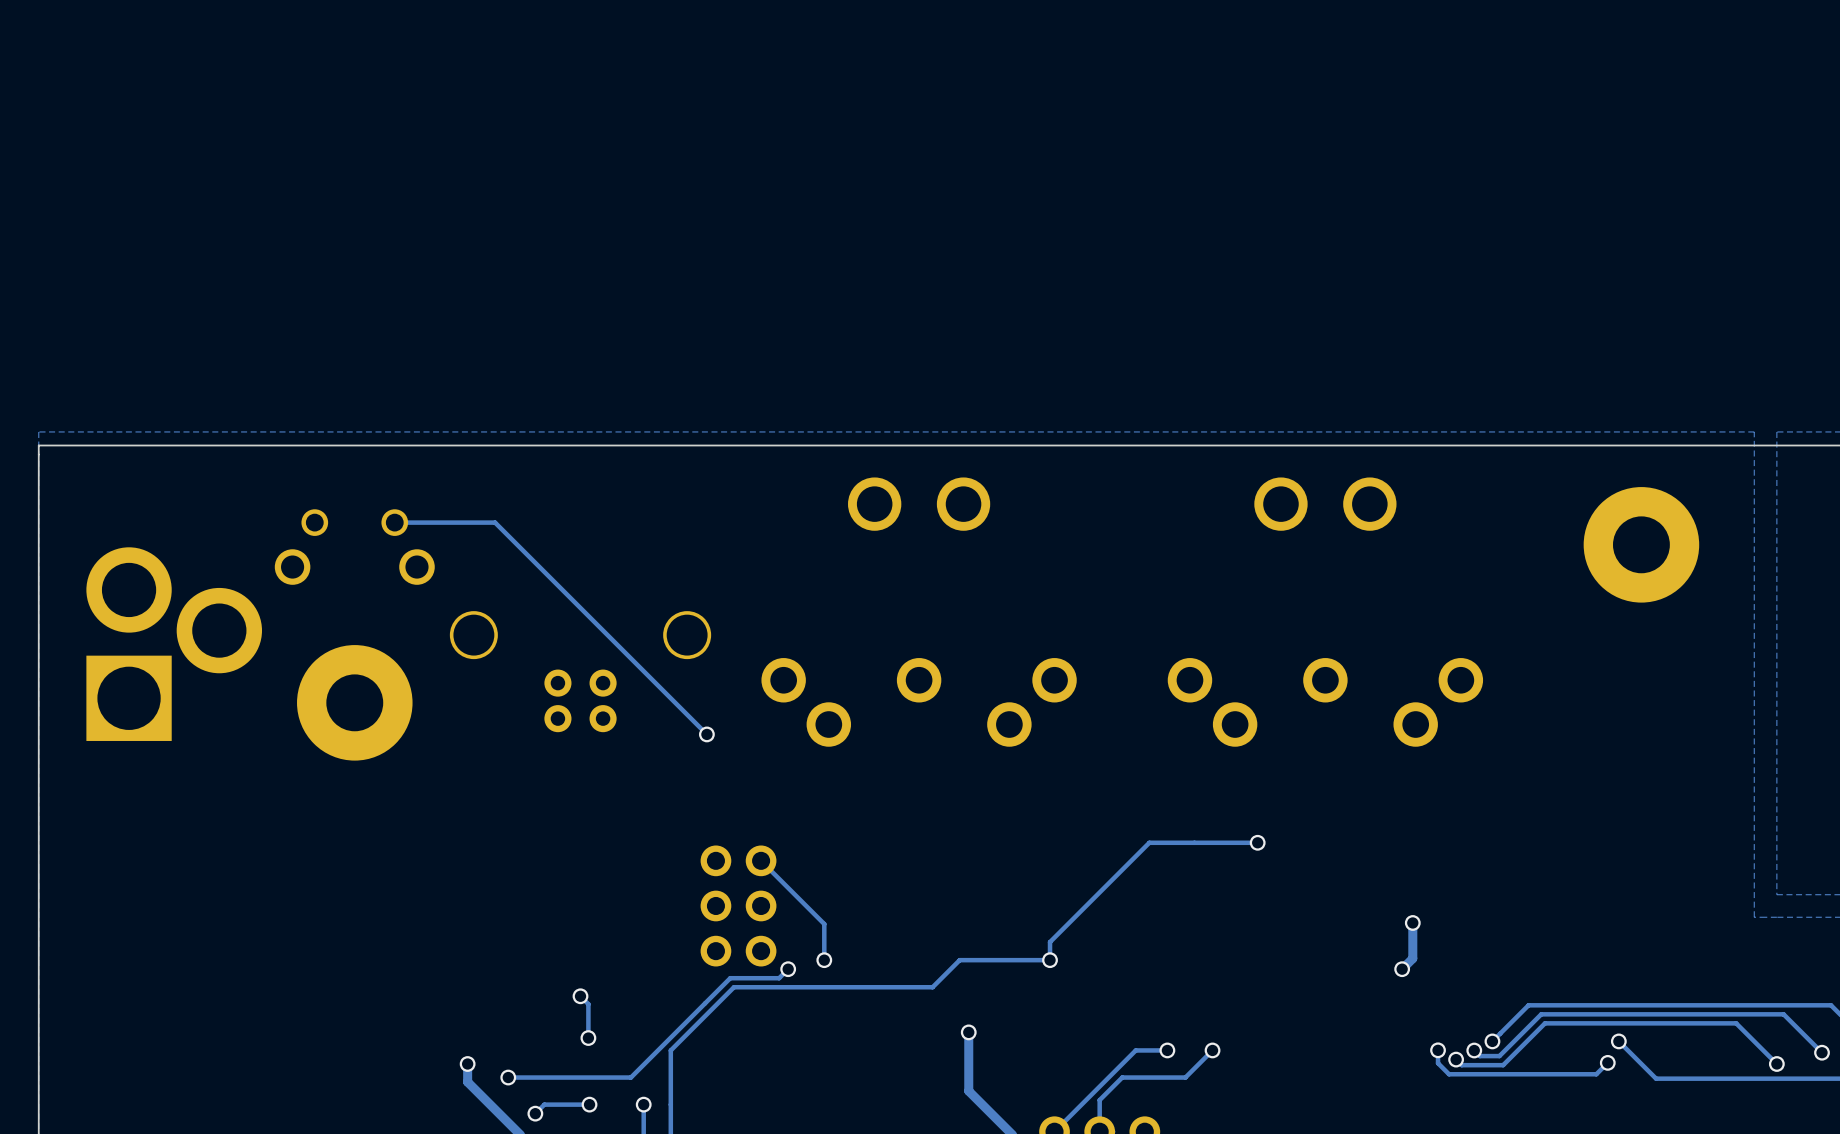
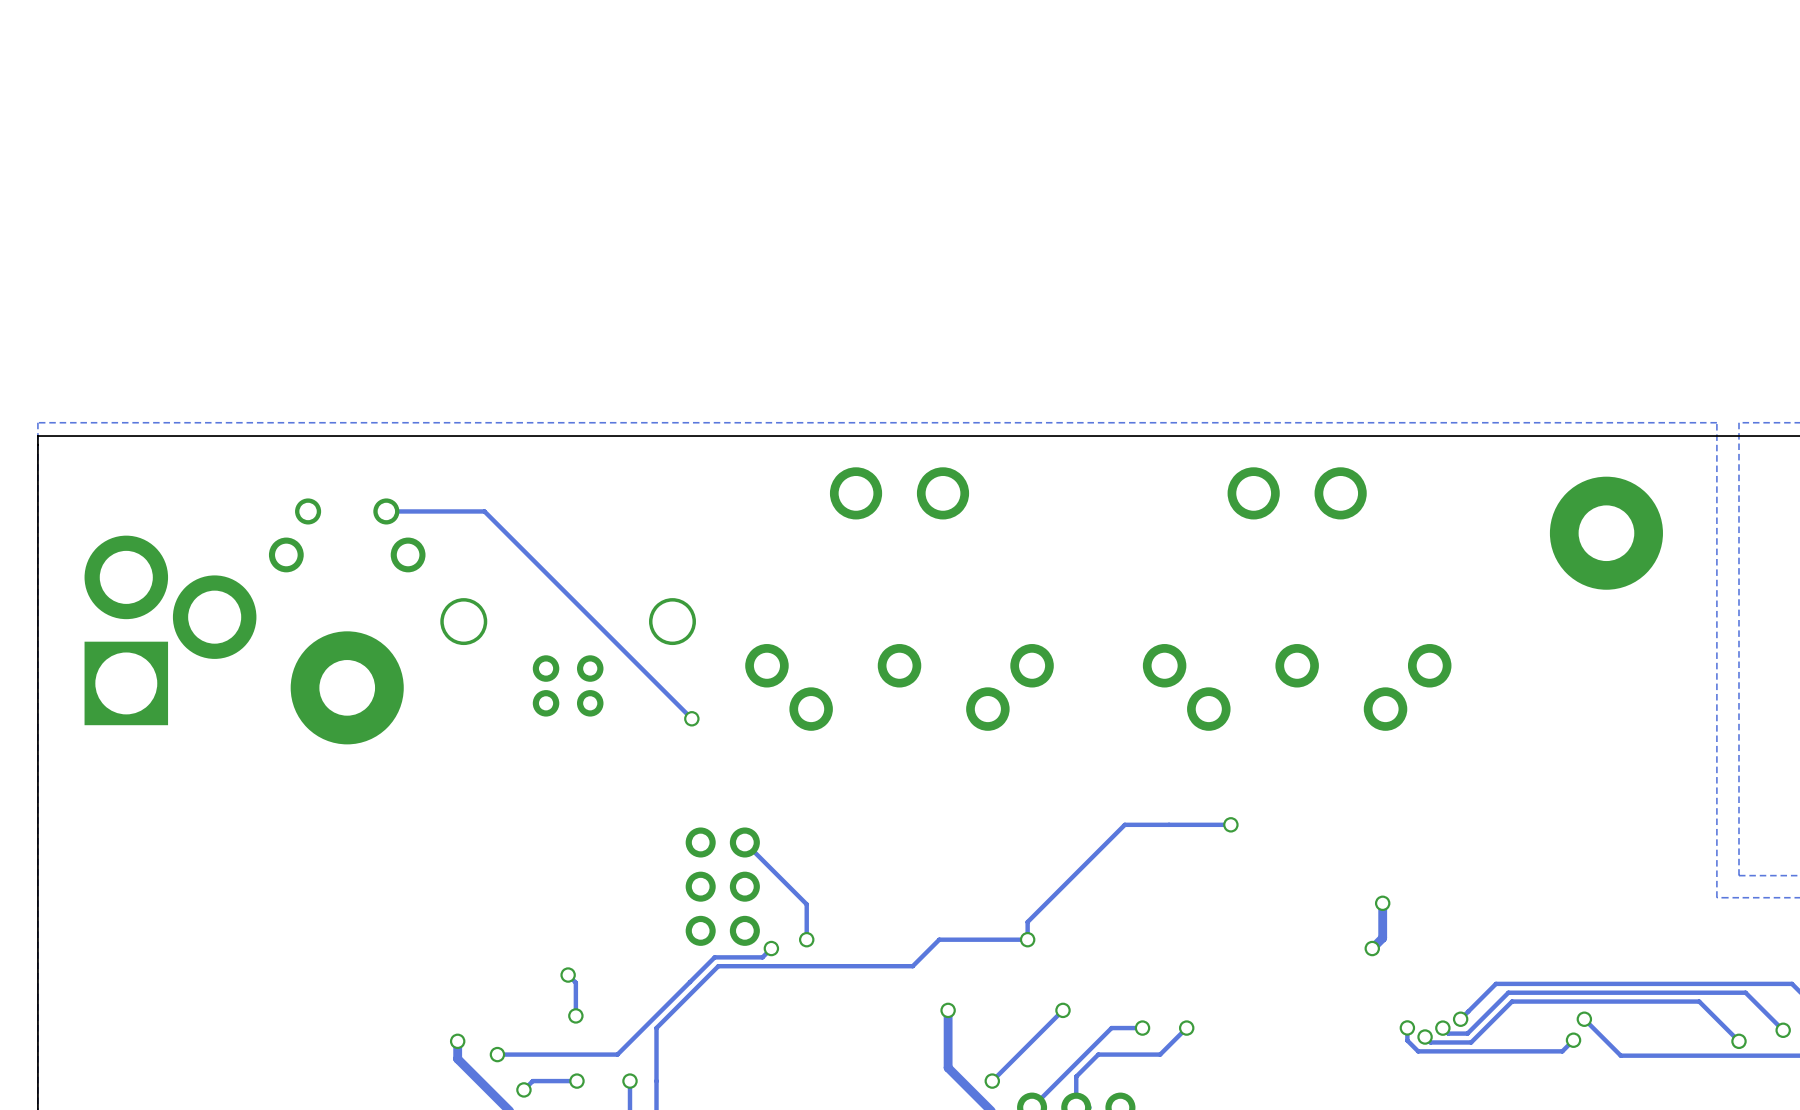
track: none -> (1062, 1010) (992, 1081)
via: none -> (1062, 1010)
via: none -> (992, 1081)

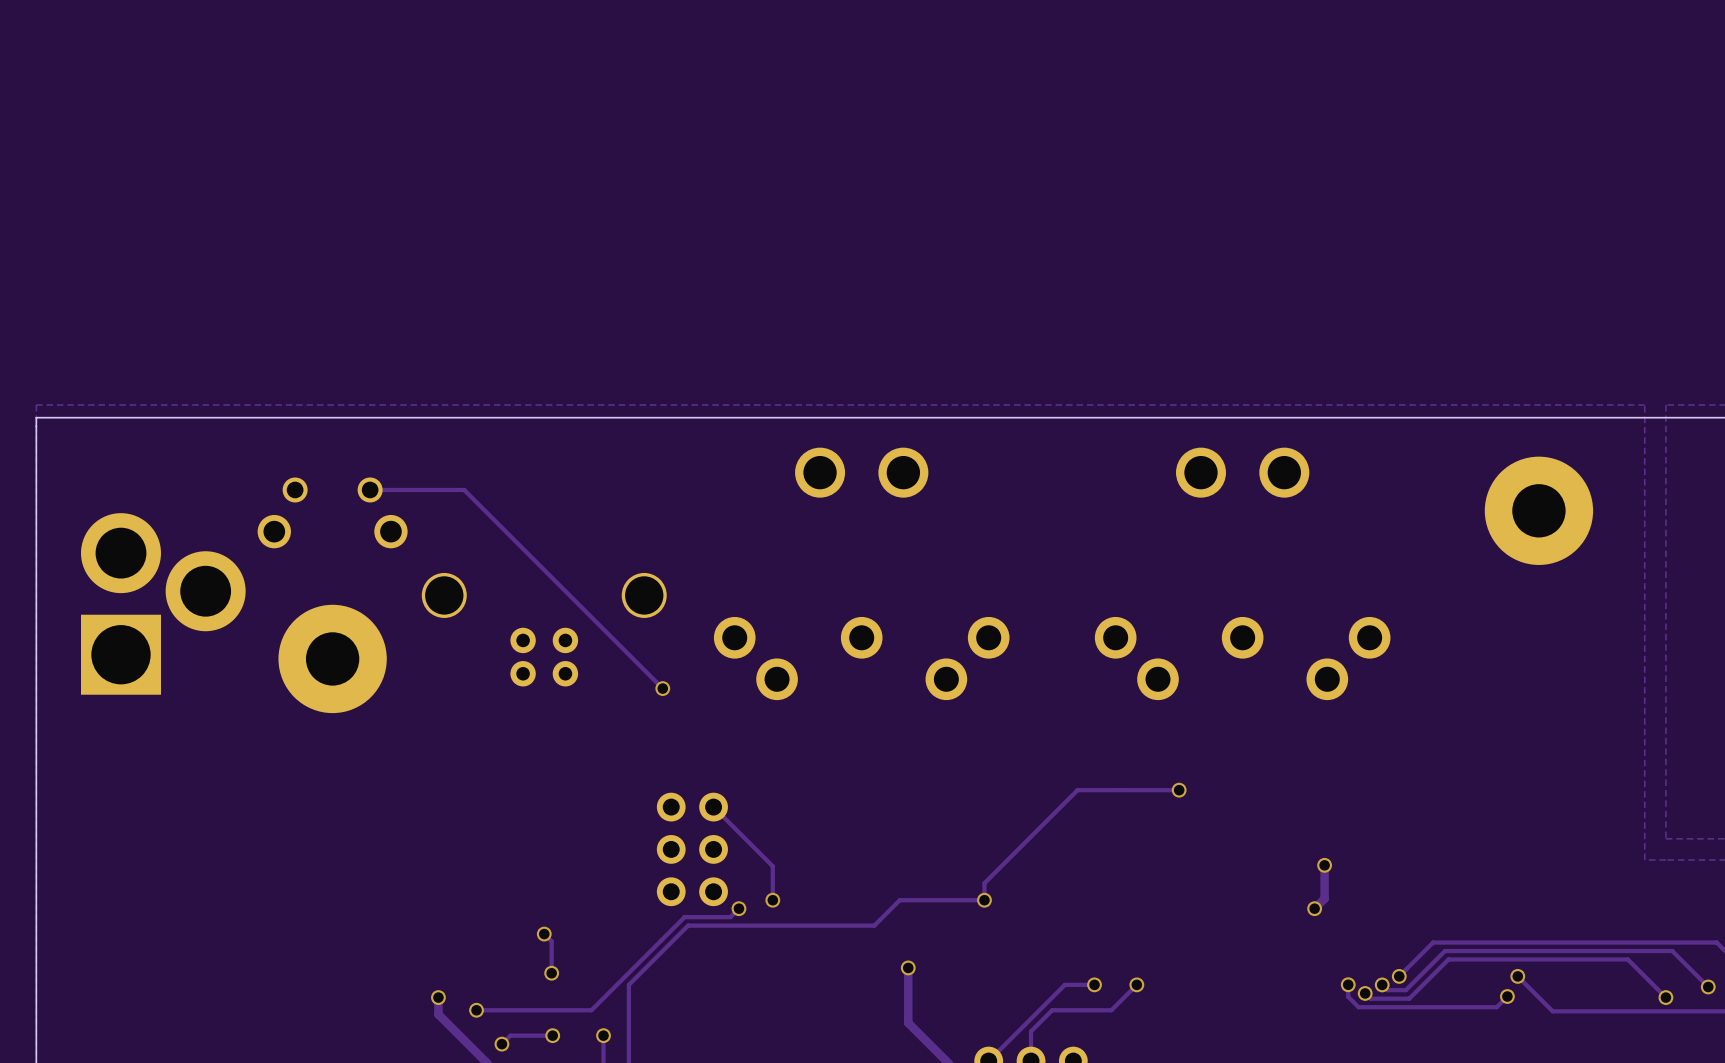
track: (1062, 1010) (992, 1081) -> none
via: (1062, 1010) -> none
via: (992, 1081) -> none

